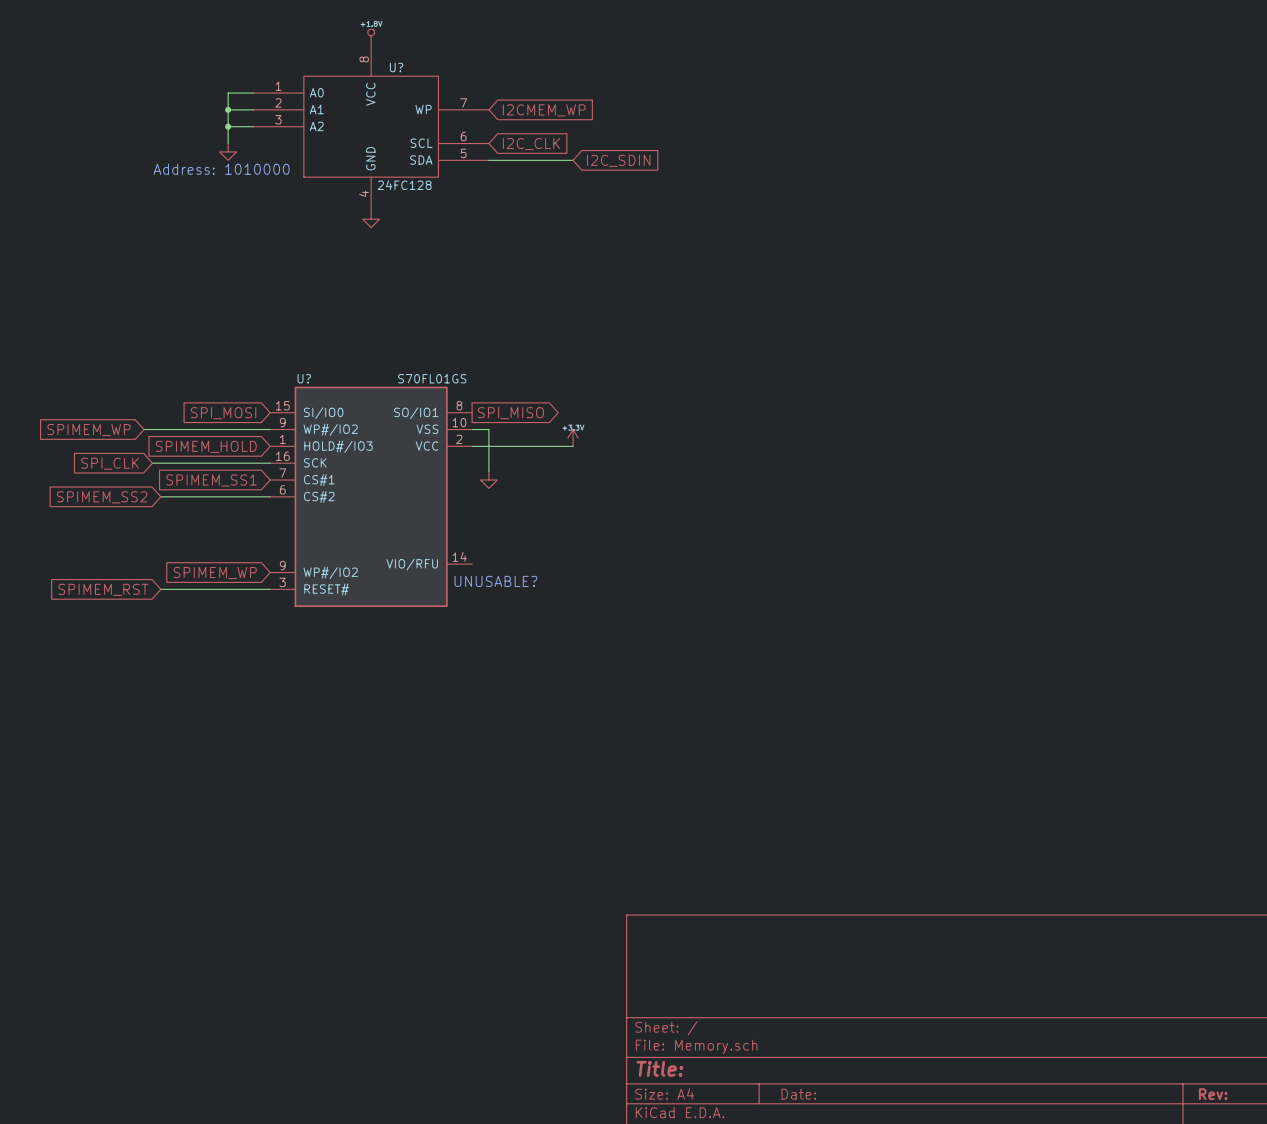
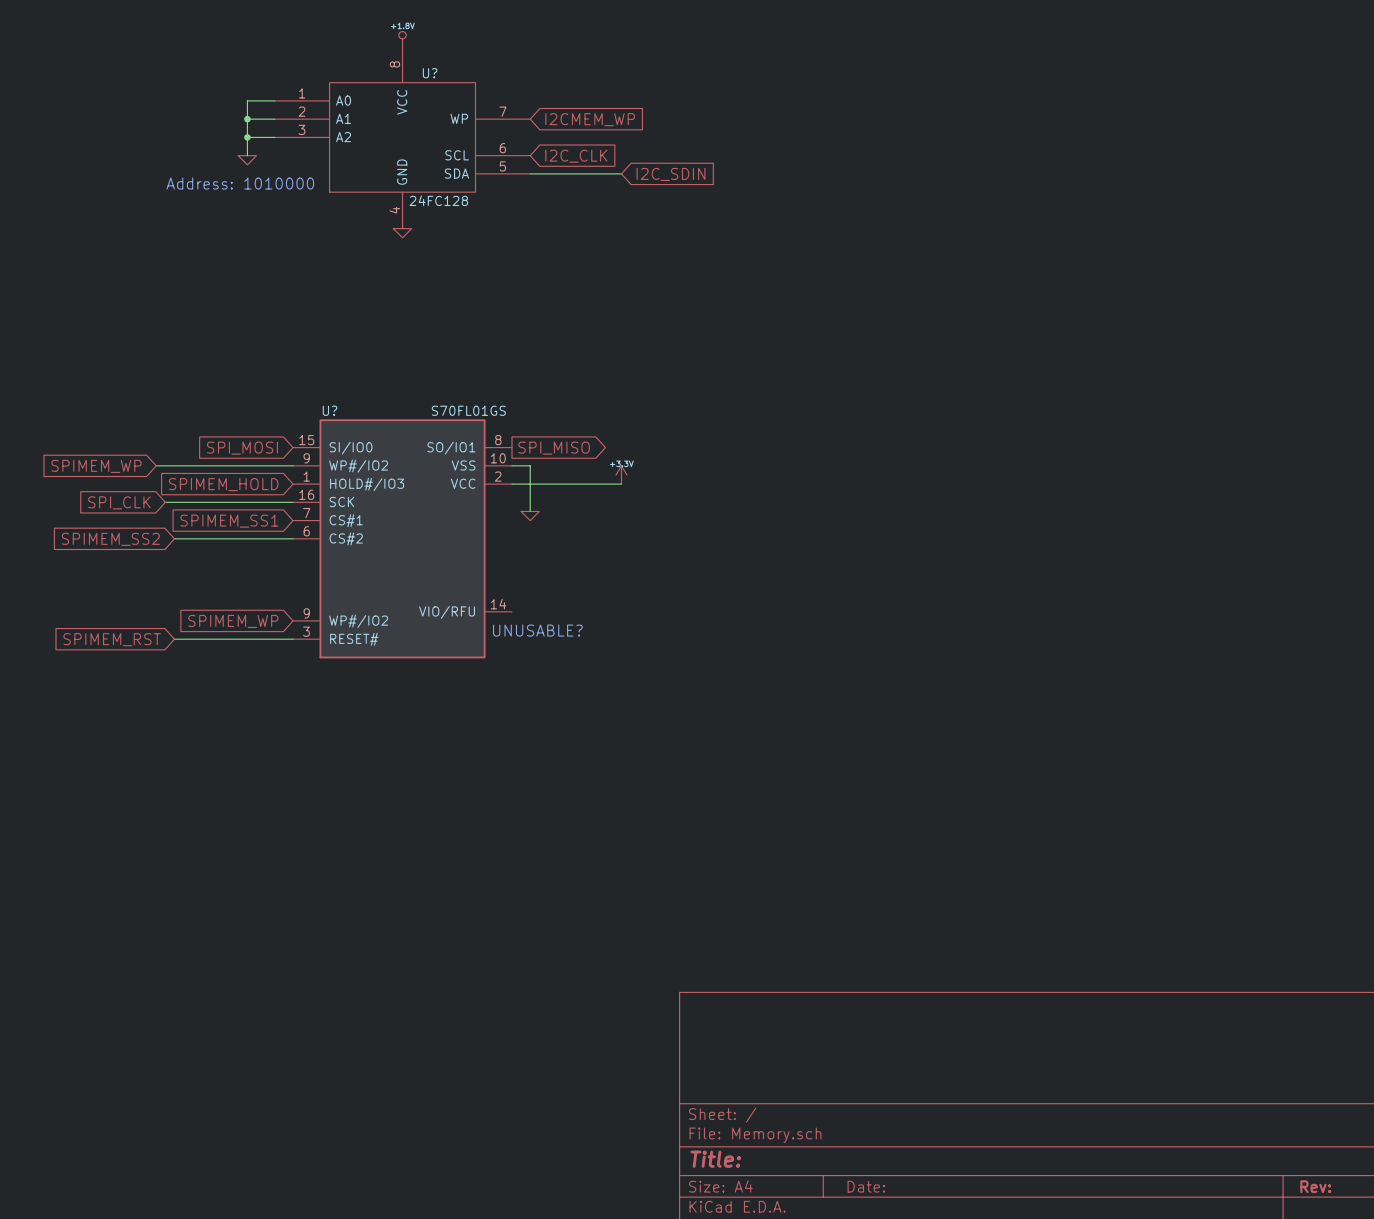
power symbol shape: [219, 143, 237, 161] -> [238, 155, 257, 165]
power symbol shape: [362, 210, 380, 228] -> [393, 228, 412, 238]
power symbol shape: [480, 471, 498, 489] -> [521, 511, 540, 521]

